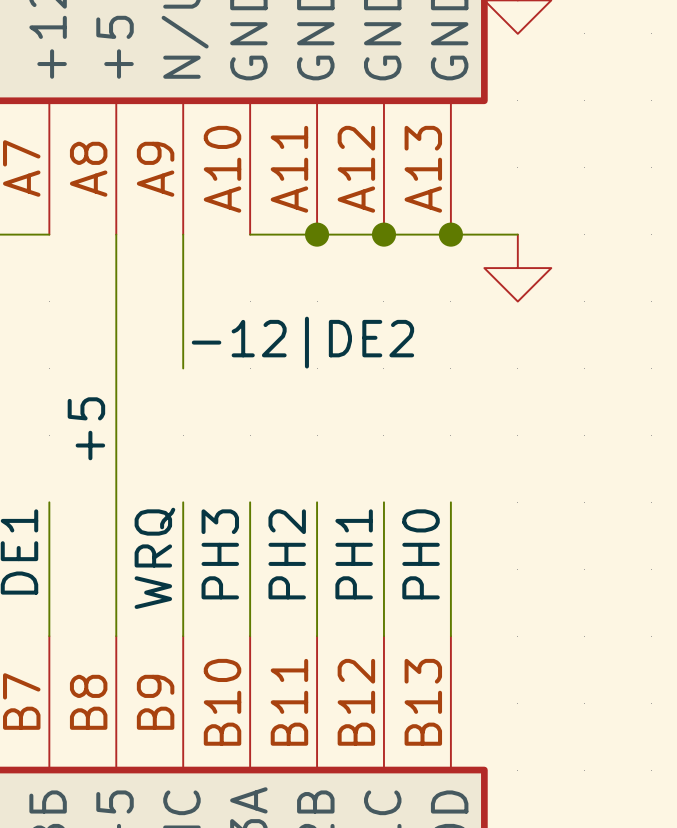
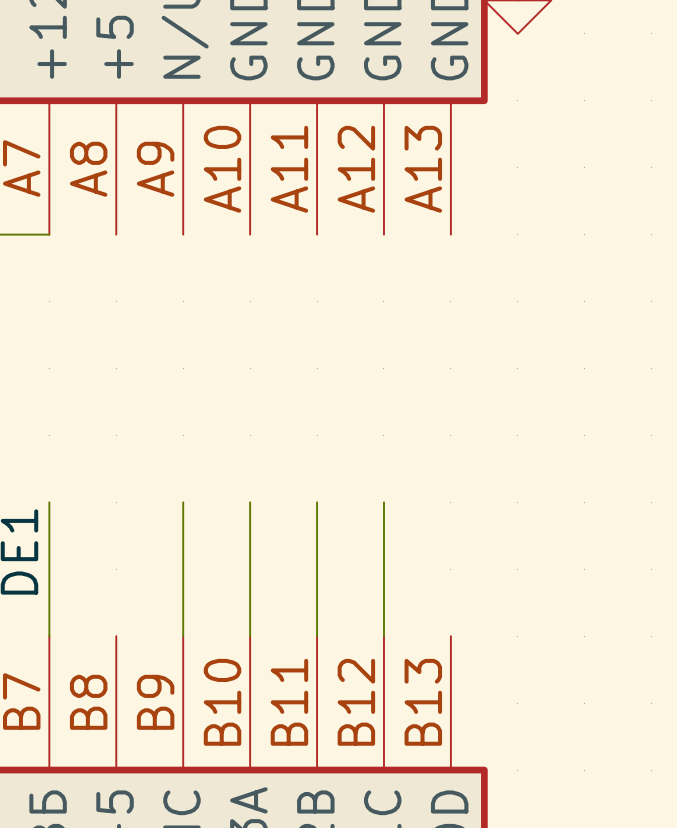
wire: (116, 234) (116, 636) -> none
wire: (183, 234) (183, 368) -> none
wire: (250, 234) (517, 234) -> none
junction: (317, 234) -> none
junction: (383, 234) -> none
junction: (450, 234) -> none
power symbol: (517, 268) -> none
label: -12|DE2 (302, 342) -> none
label: +5 (86, 428) -> none
wire: (450, 502) (450, 636) -> none
label: PH3 (220, 554) -> none
label: PH2 (287, 554) -> none
label: PH1 (354, 554) -> none
label: PH0 (421, 554) -> none
label: WRQ (154, 558) -> none

